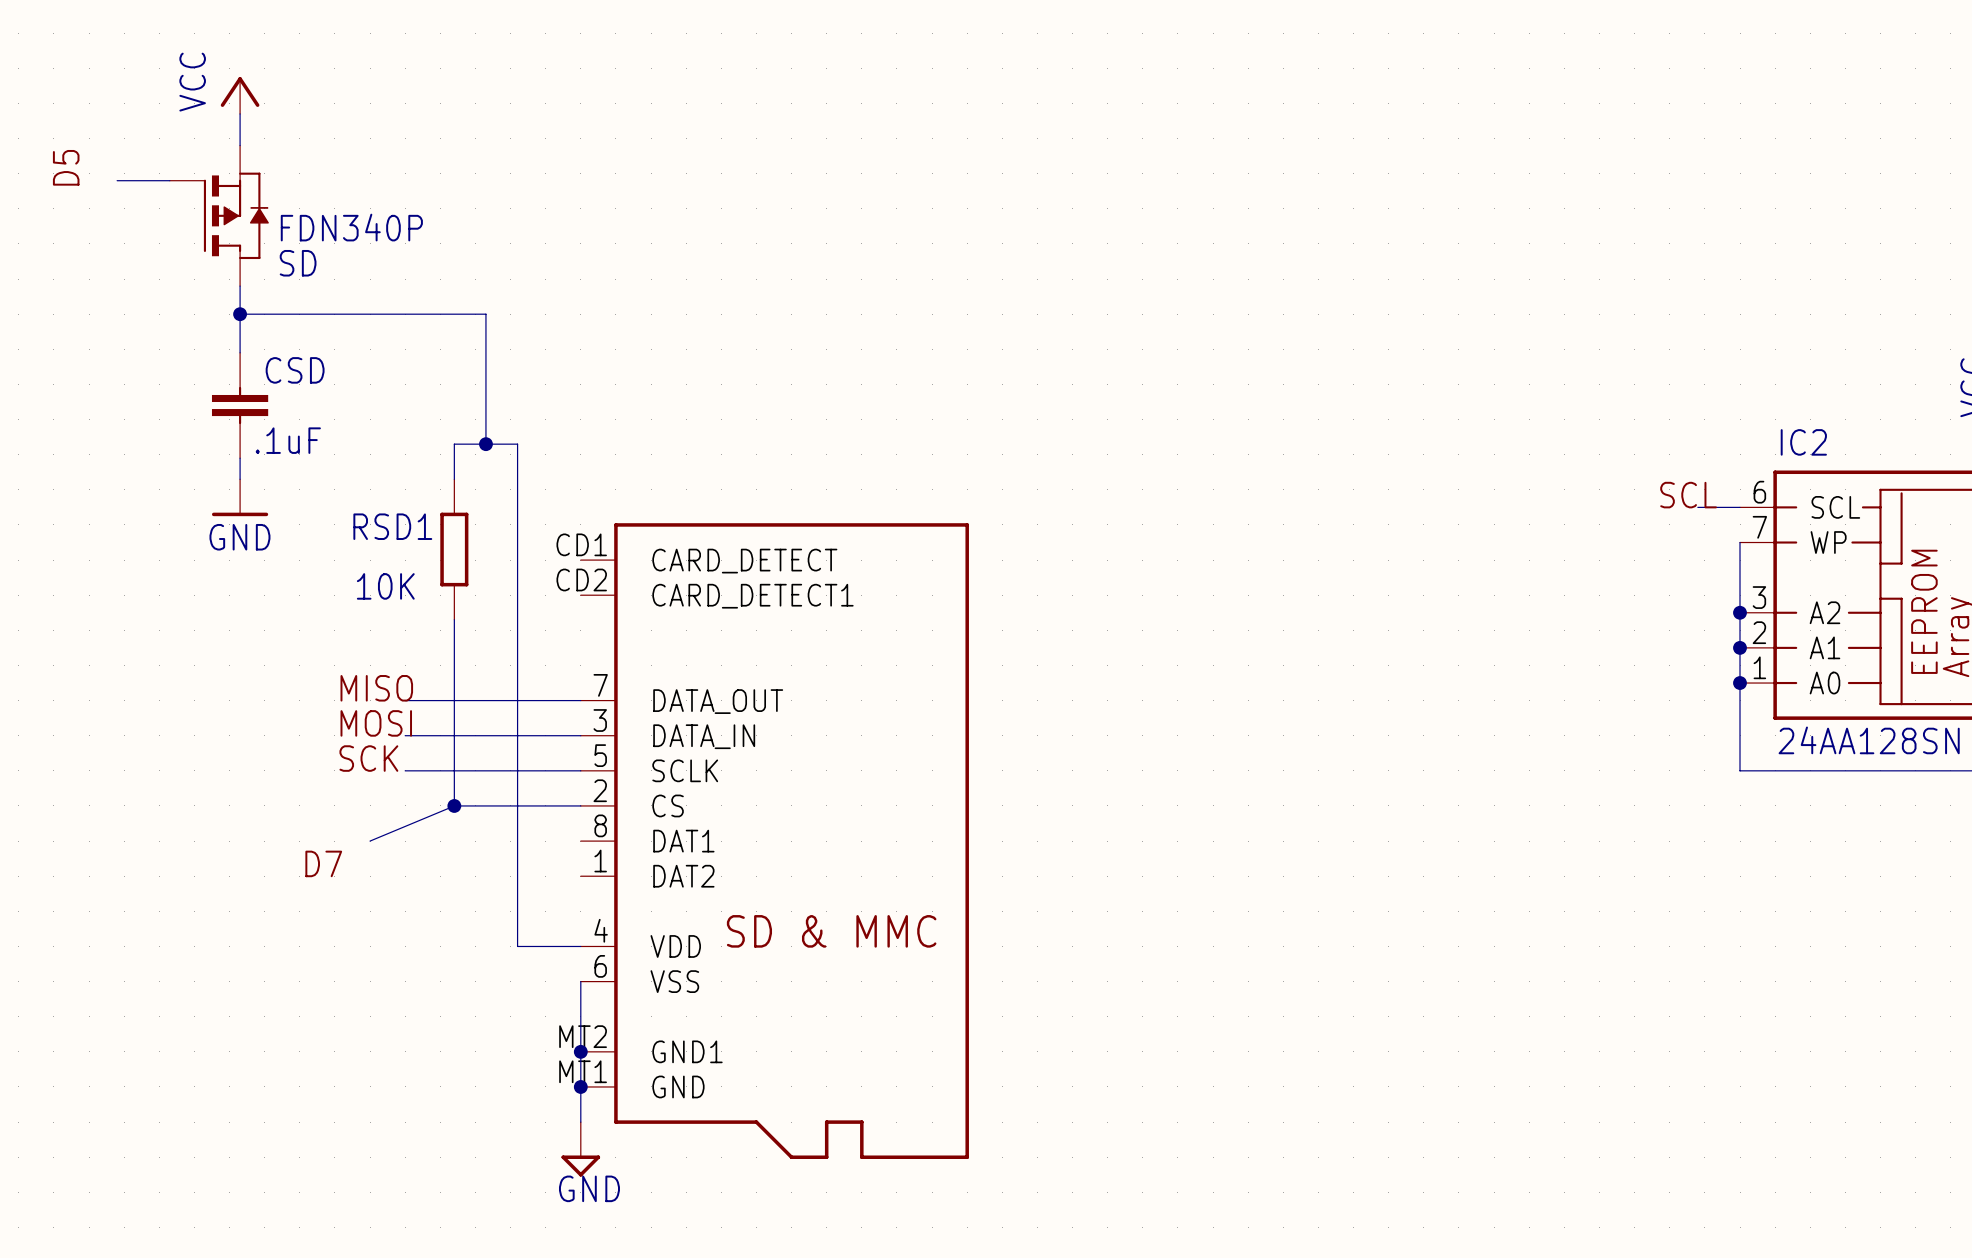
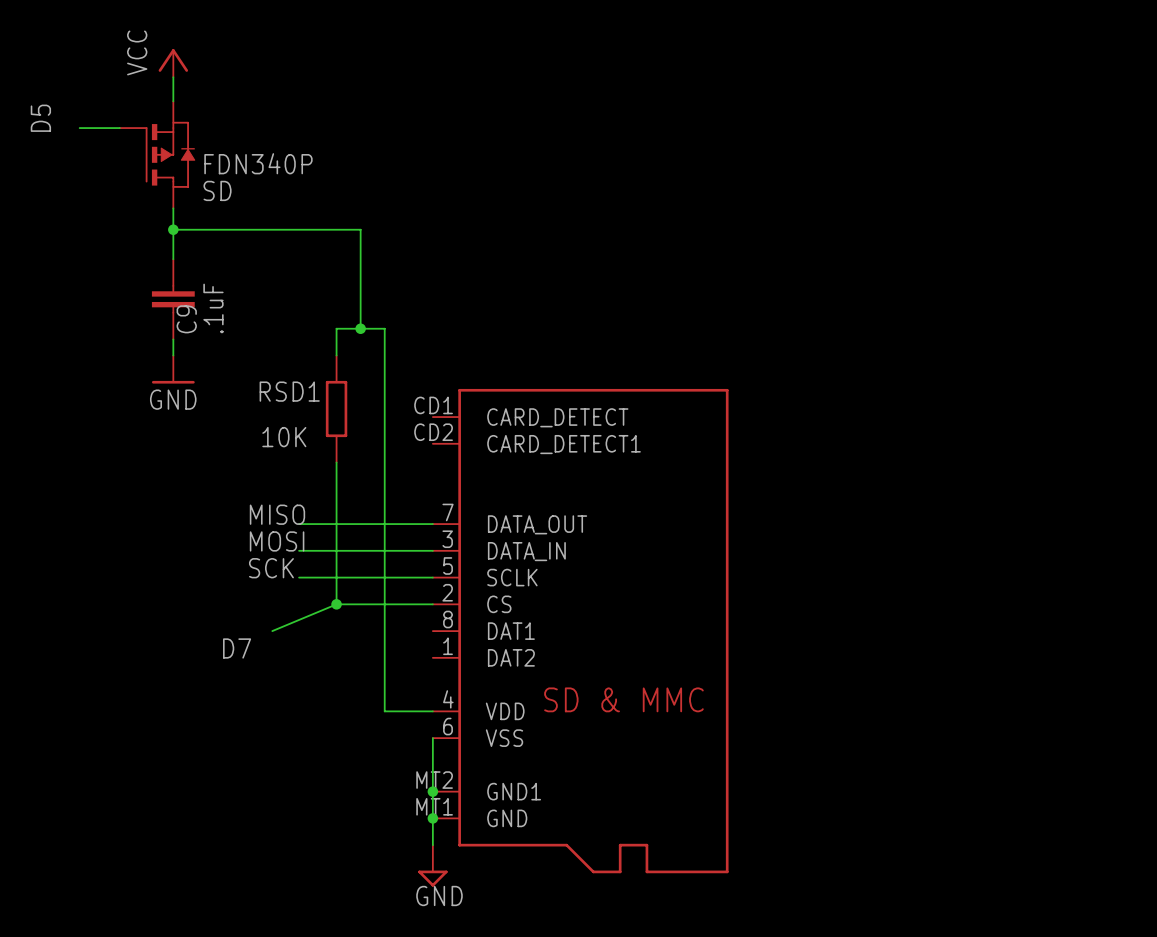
CSD name: CSD (295, 370) -> C9 (186, 319)
CSD value rotation: 0° (288, 440) -> 90° counterclockwise (213, 308)

